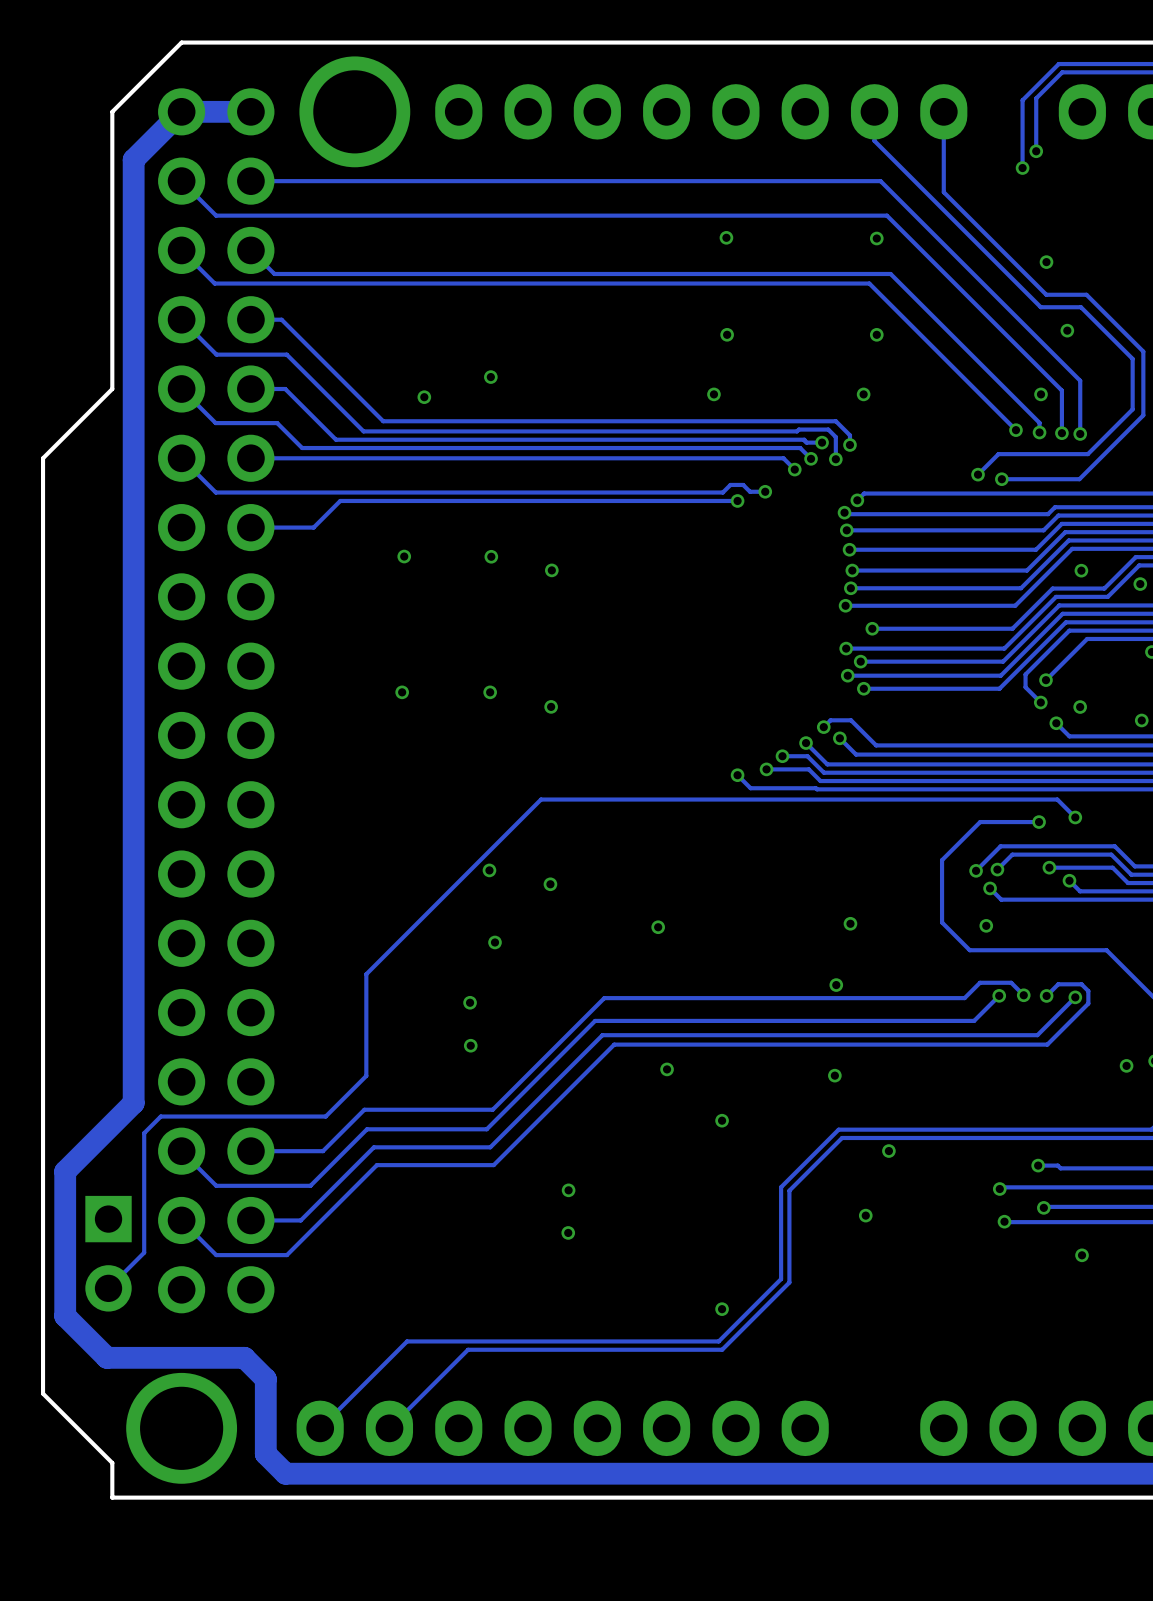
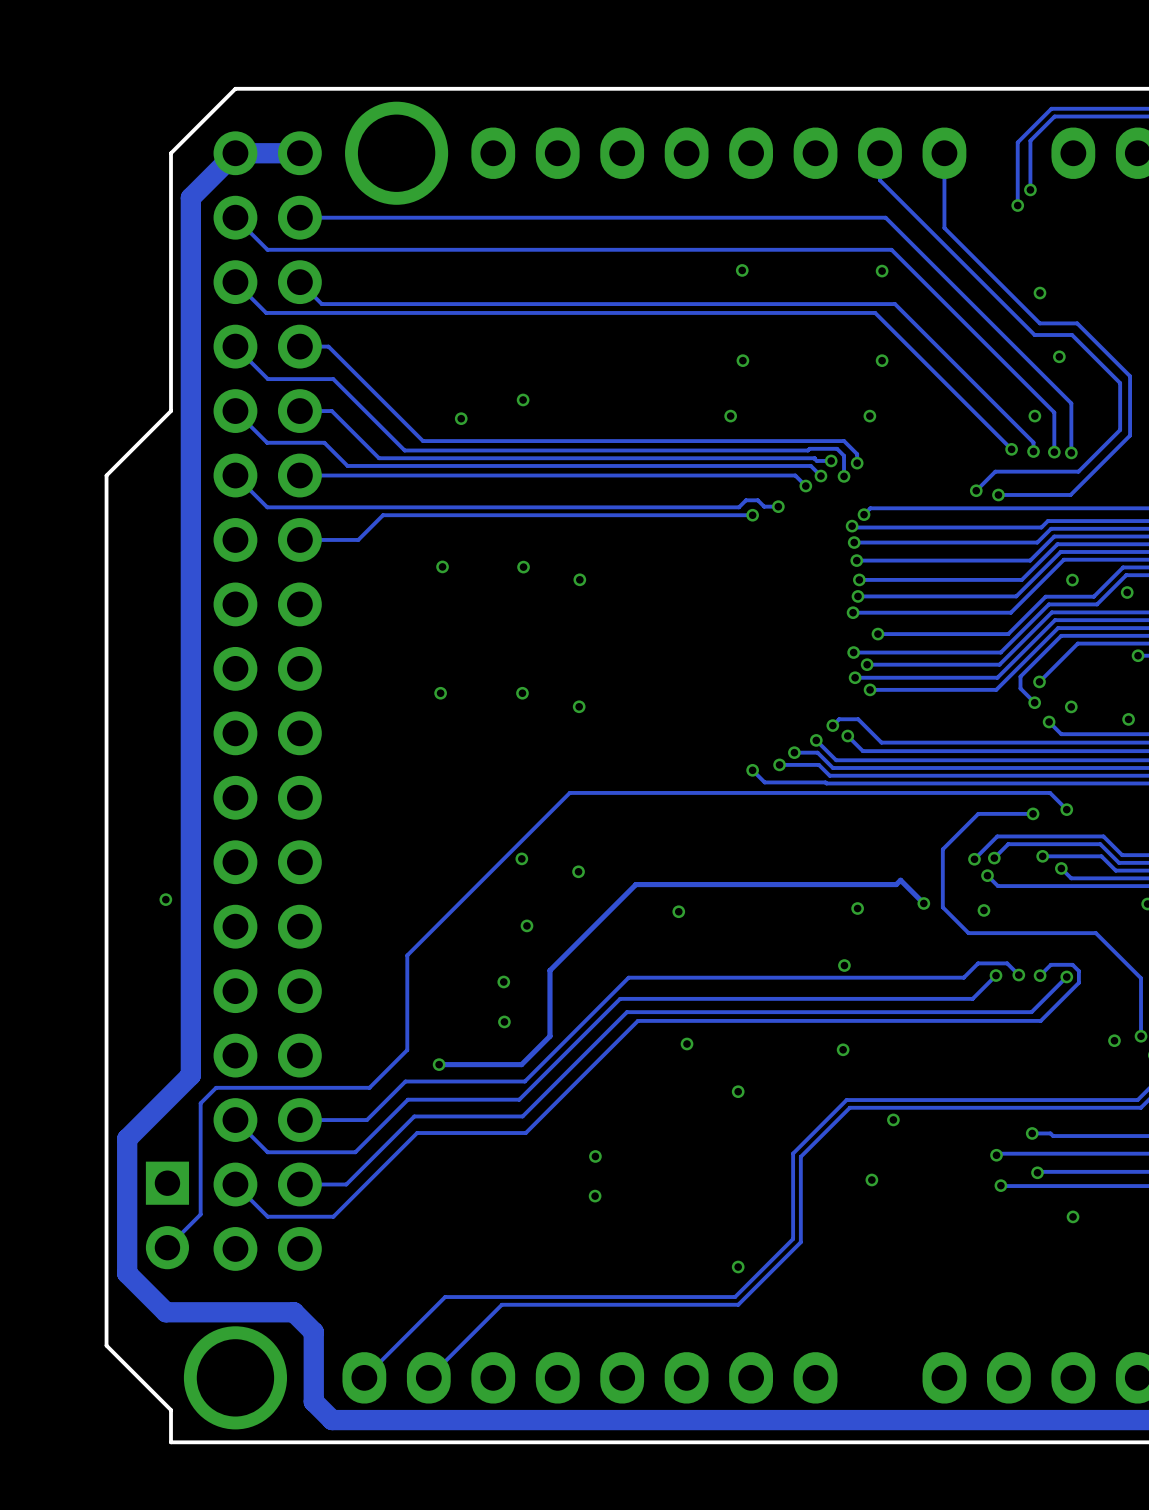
via: none -> (165, 899)
track: none -> (923, 903) (900, 880) (896, 884) (635, 884) (549, 970) (549, 1036) (521, 1064) (439, 1064)
via: none -> (923, 903)
via: none -> (439, 1064)

